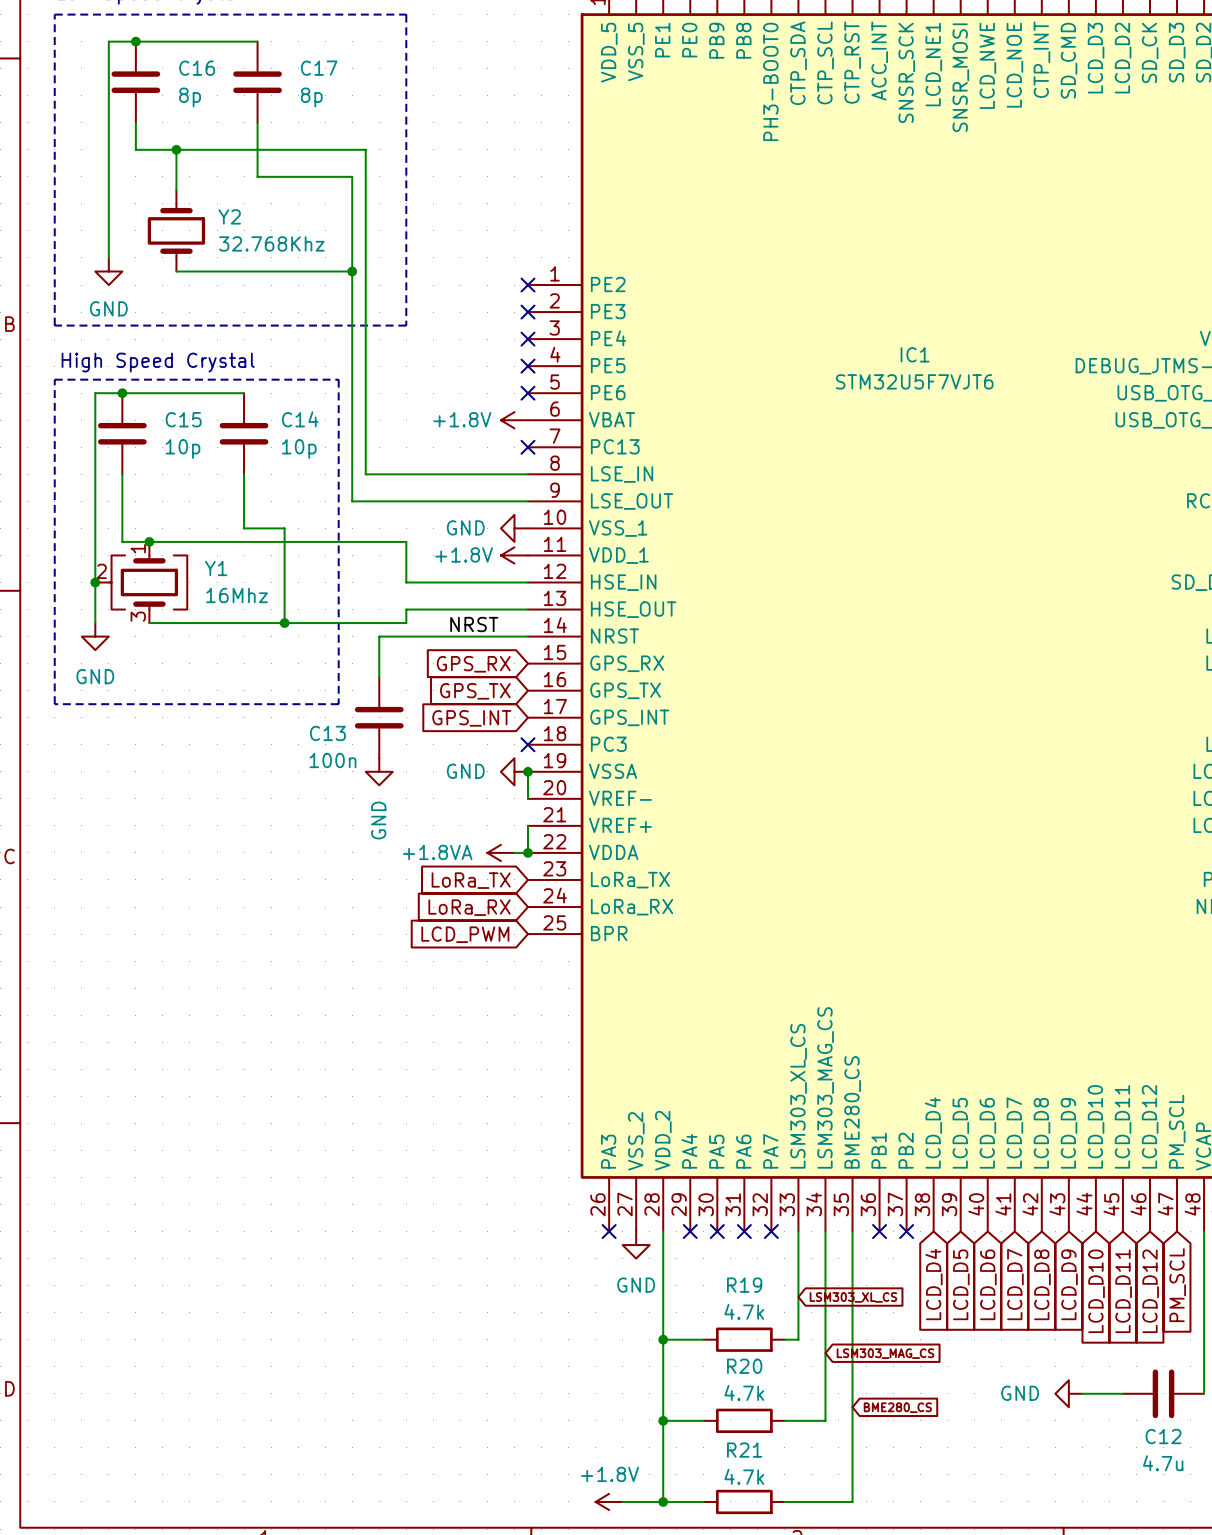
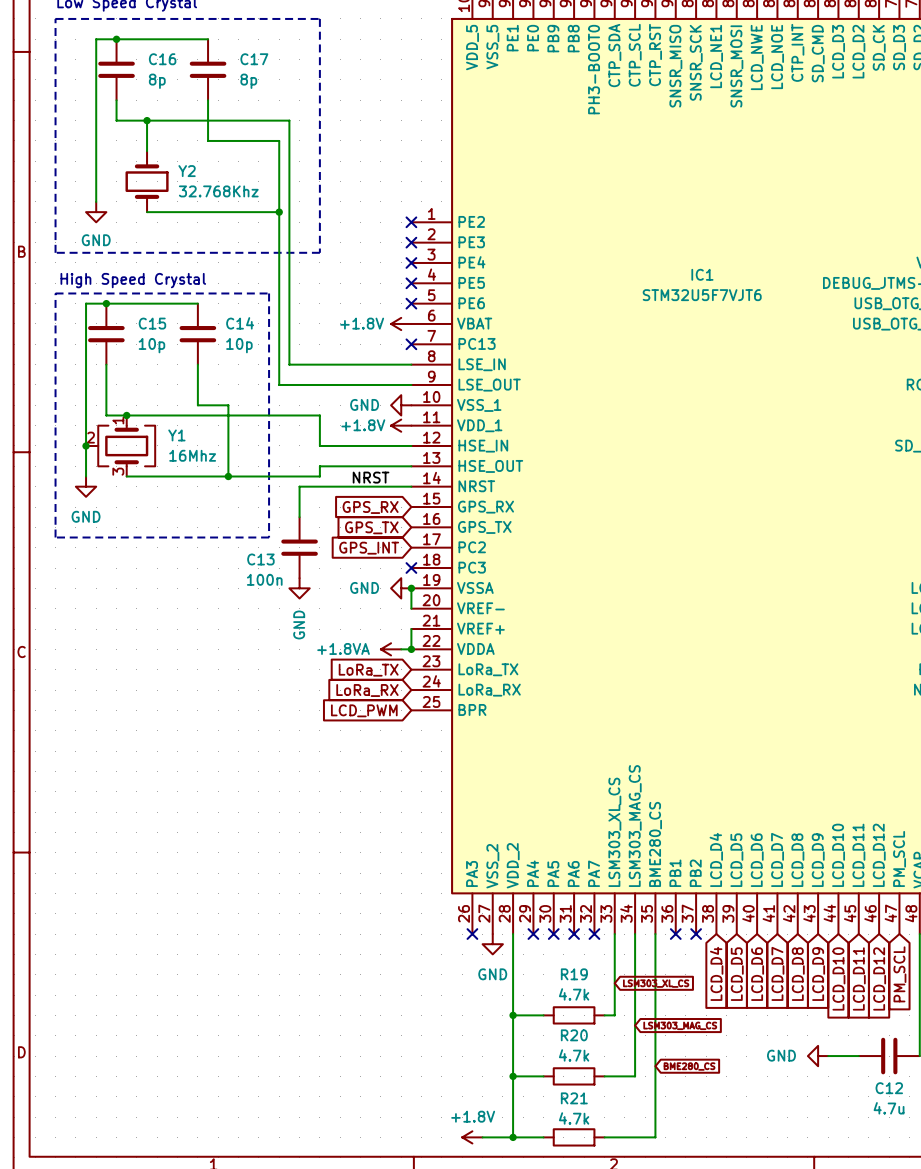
IC1 pin name: ACC_INT (879, 60) -> SNSR_MISO (675, 66)
IC1 pin name: GPS_INT (629, 717) -> PC2 (472, 547)

